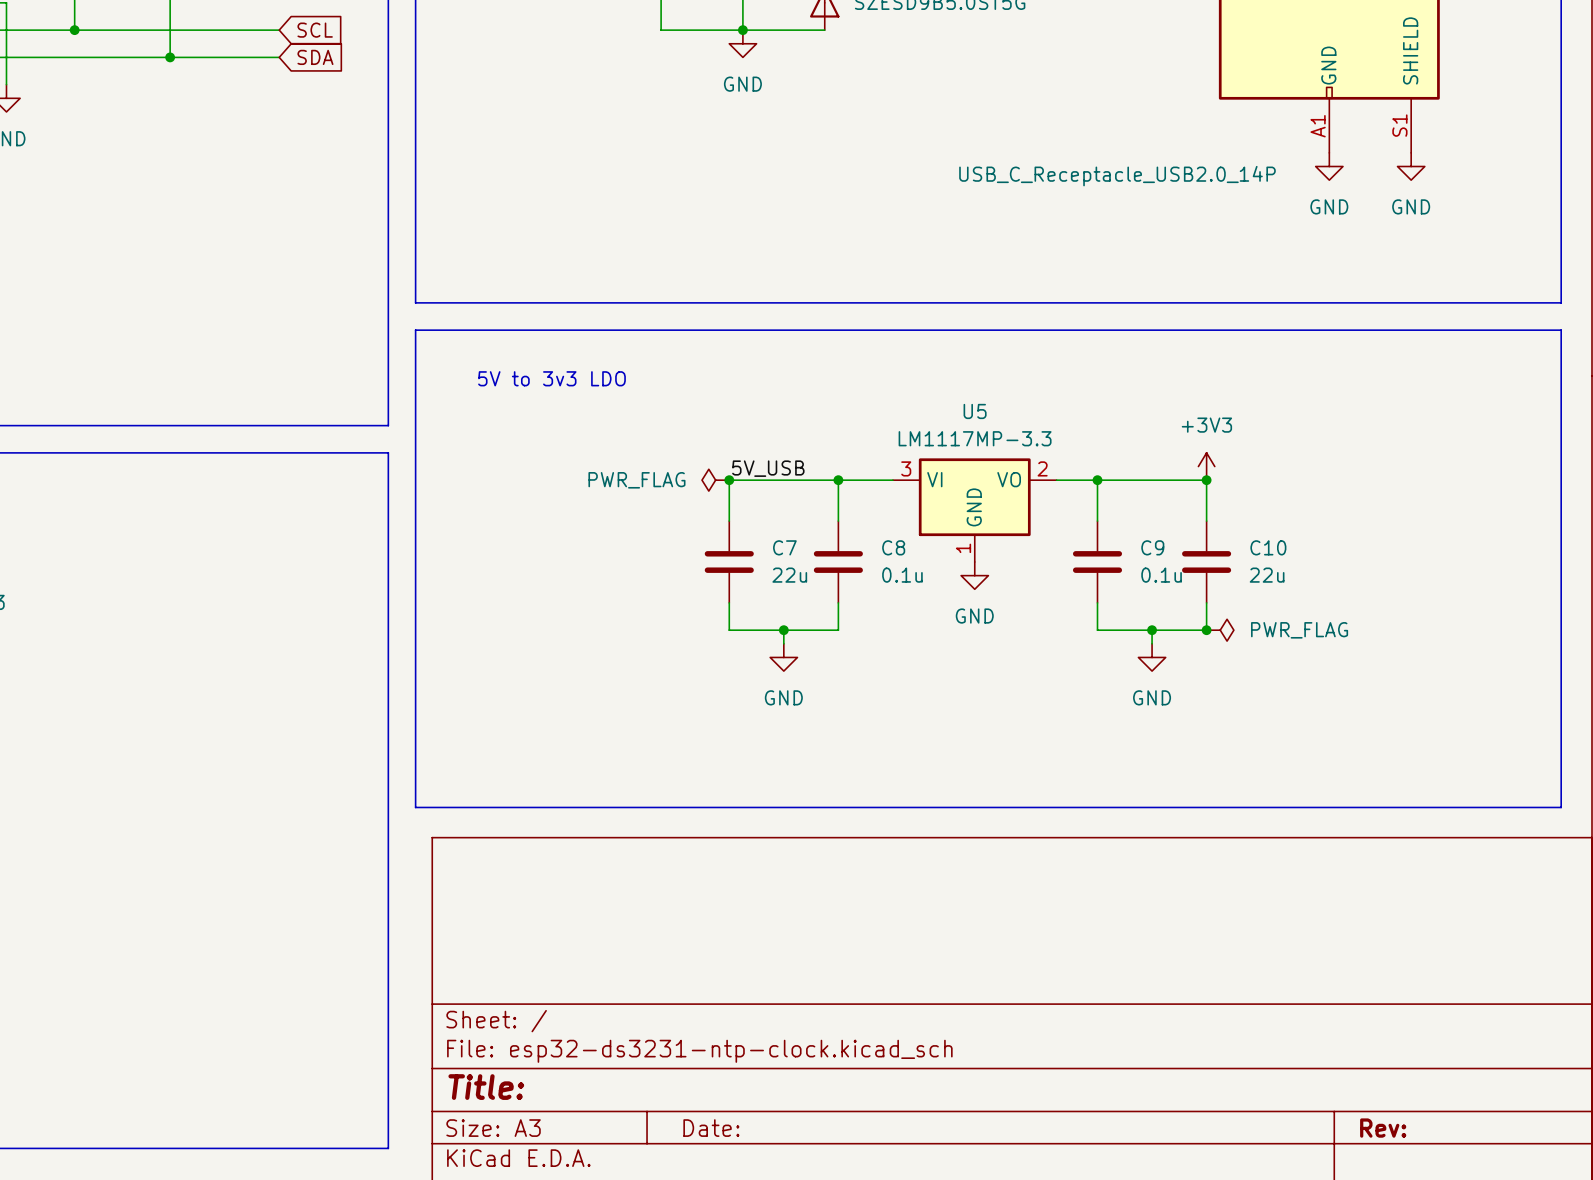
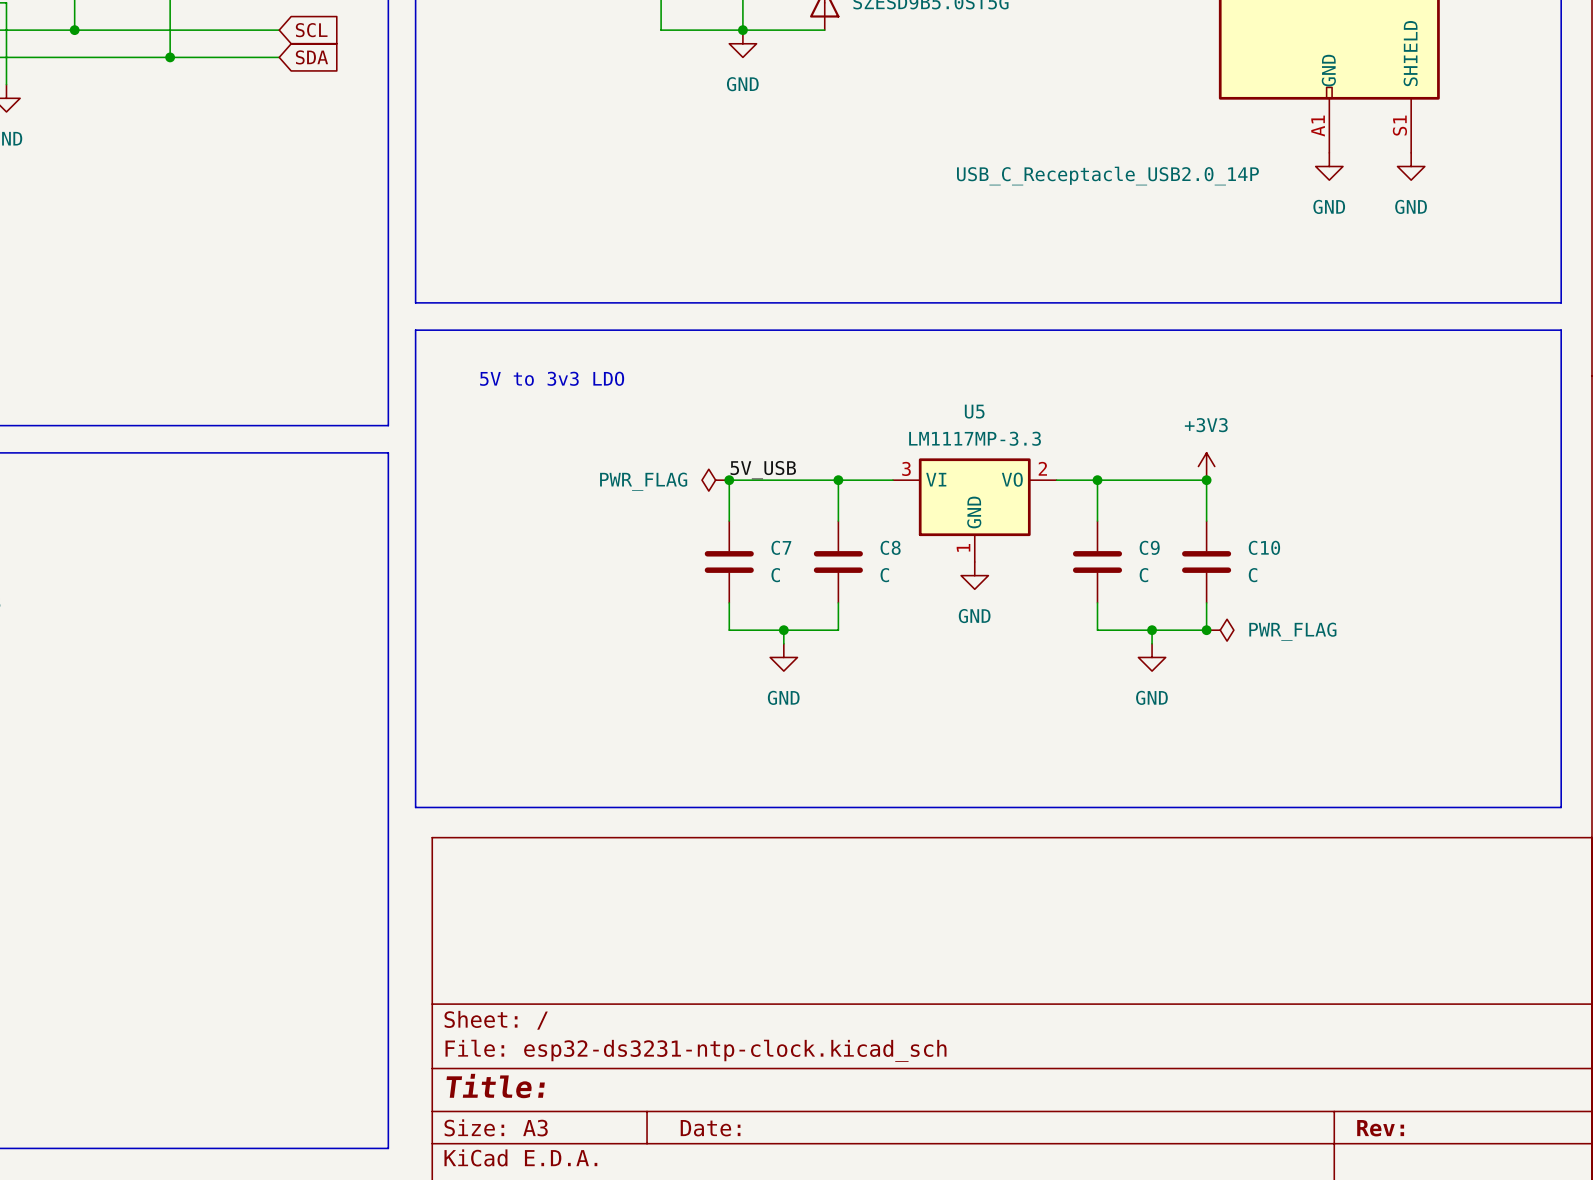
C7 value: 22u (789, 575) -> C (775, 575)
C8 value: 0.1u (902, 575) -> C (884, 575)
C9 value: 0.1u (1161, 575) -> C (1143, 575)
C10 value: 22u (1267, 575) -> C (1253, 575)

